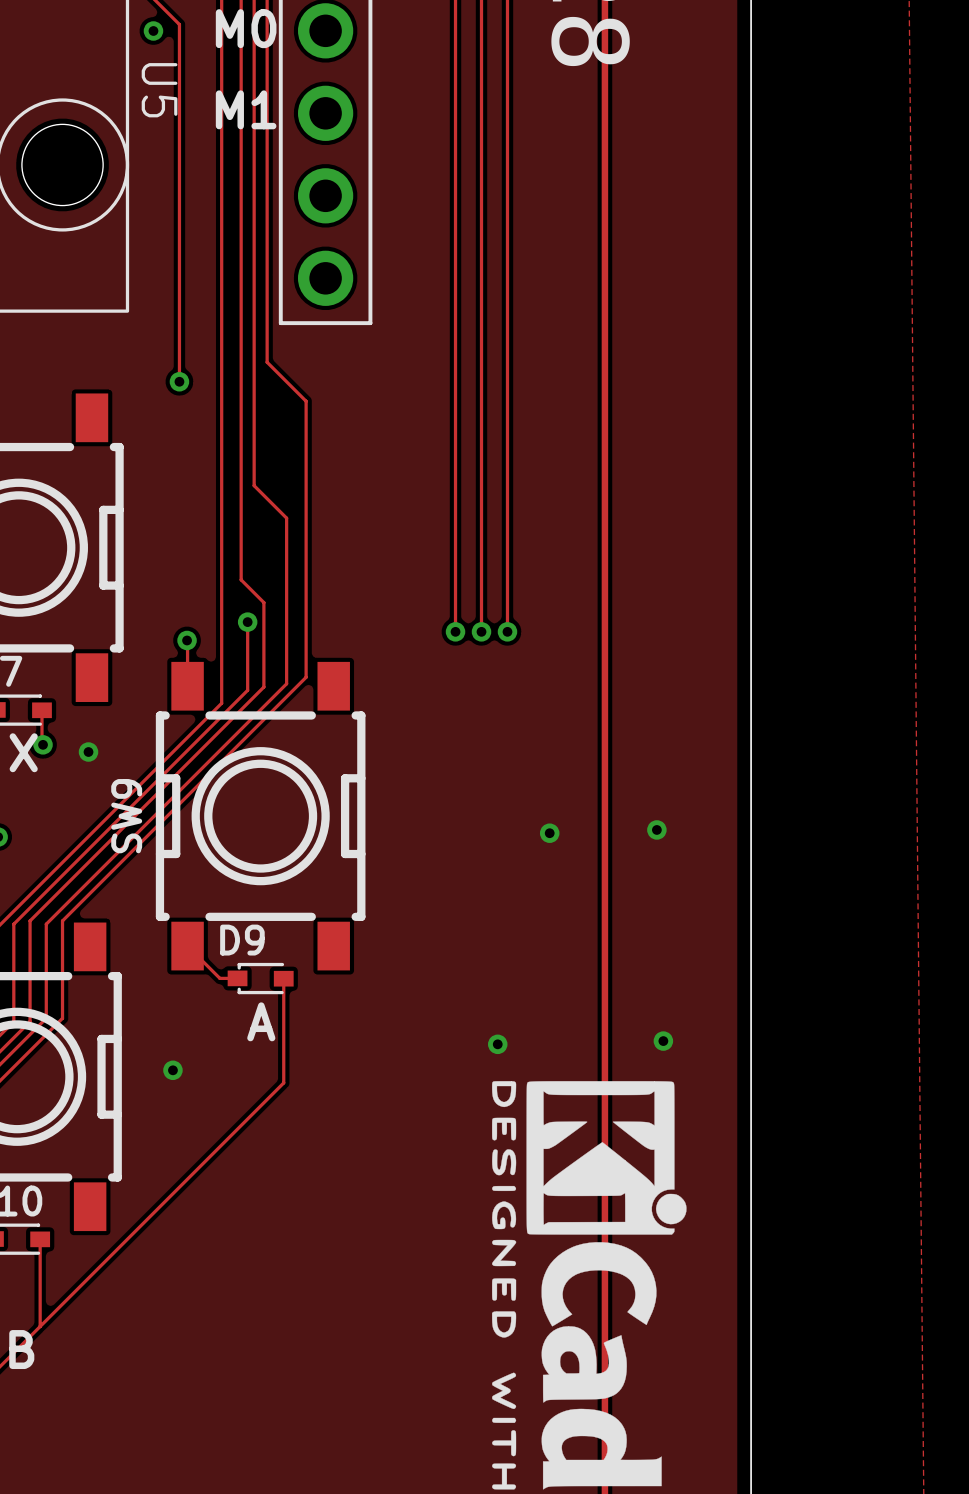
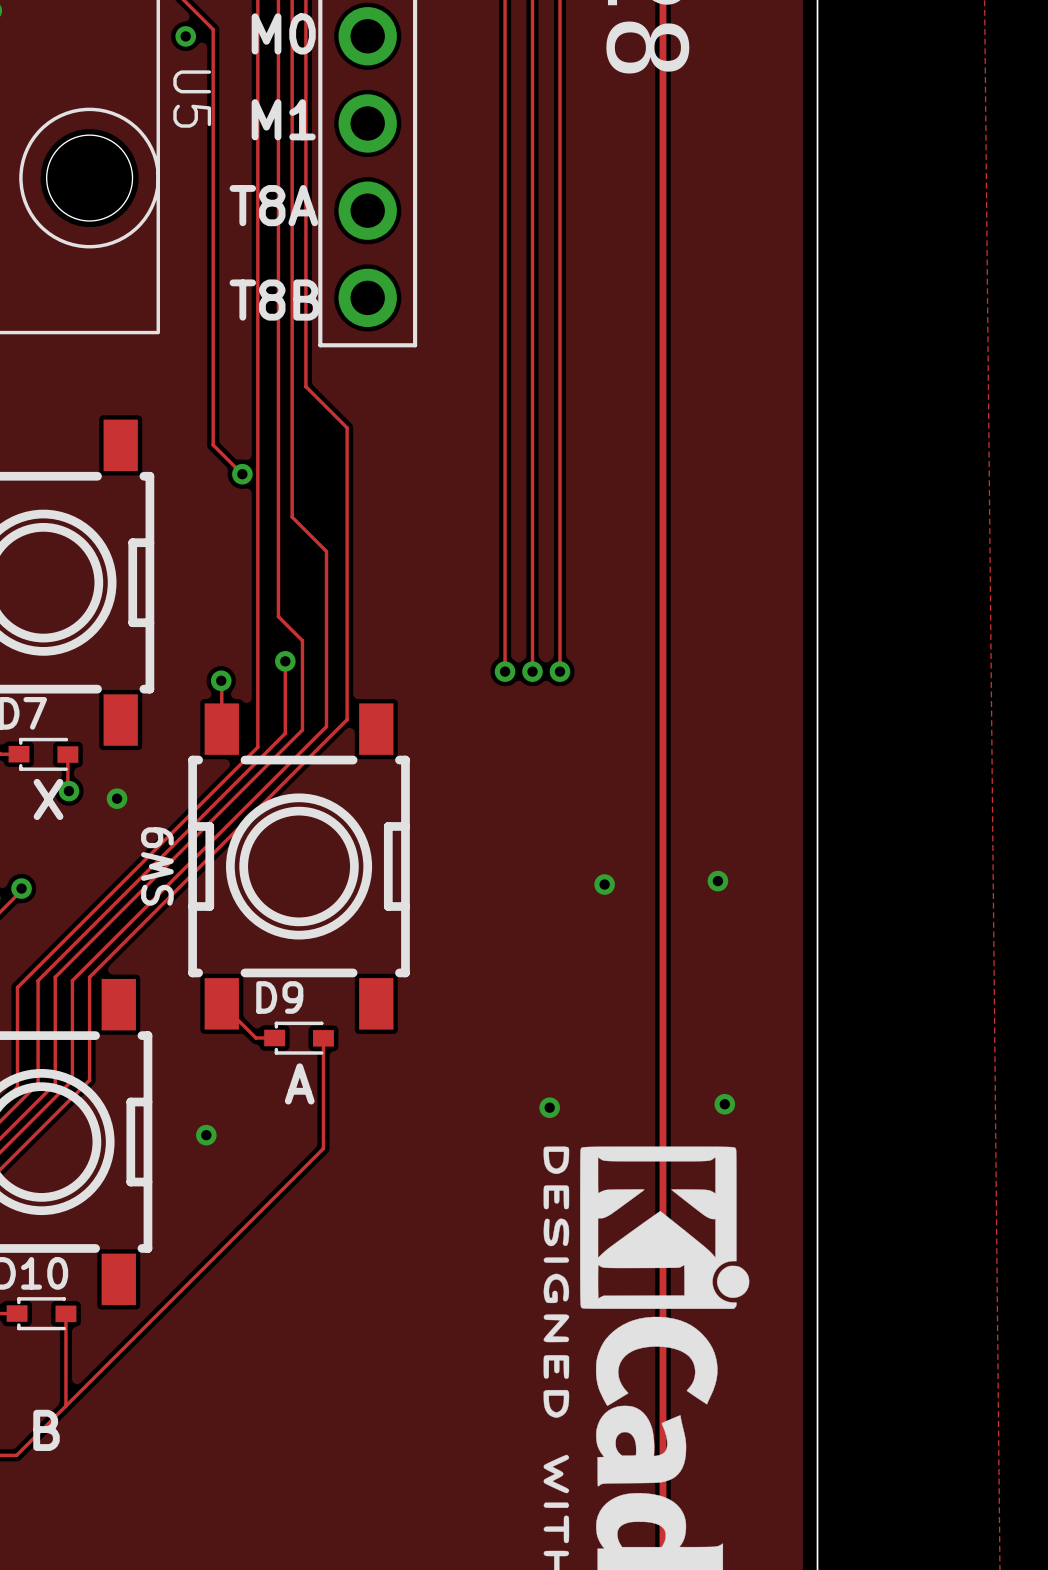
text: none -> T8A (273, 205)
text: none -> T8B (274, 300)
track: none -> (213, 407) (213, 445) (242, 474)
via position: (179, 381) -> (242, 474)

